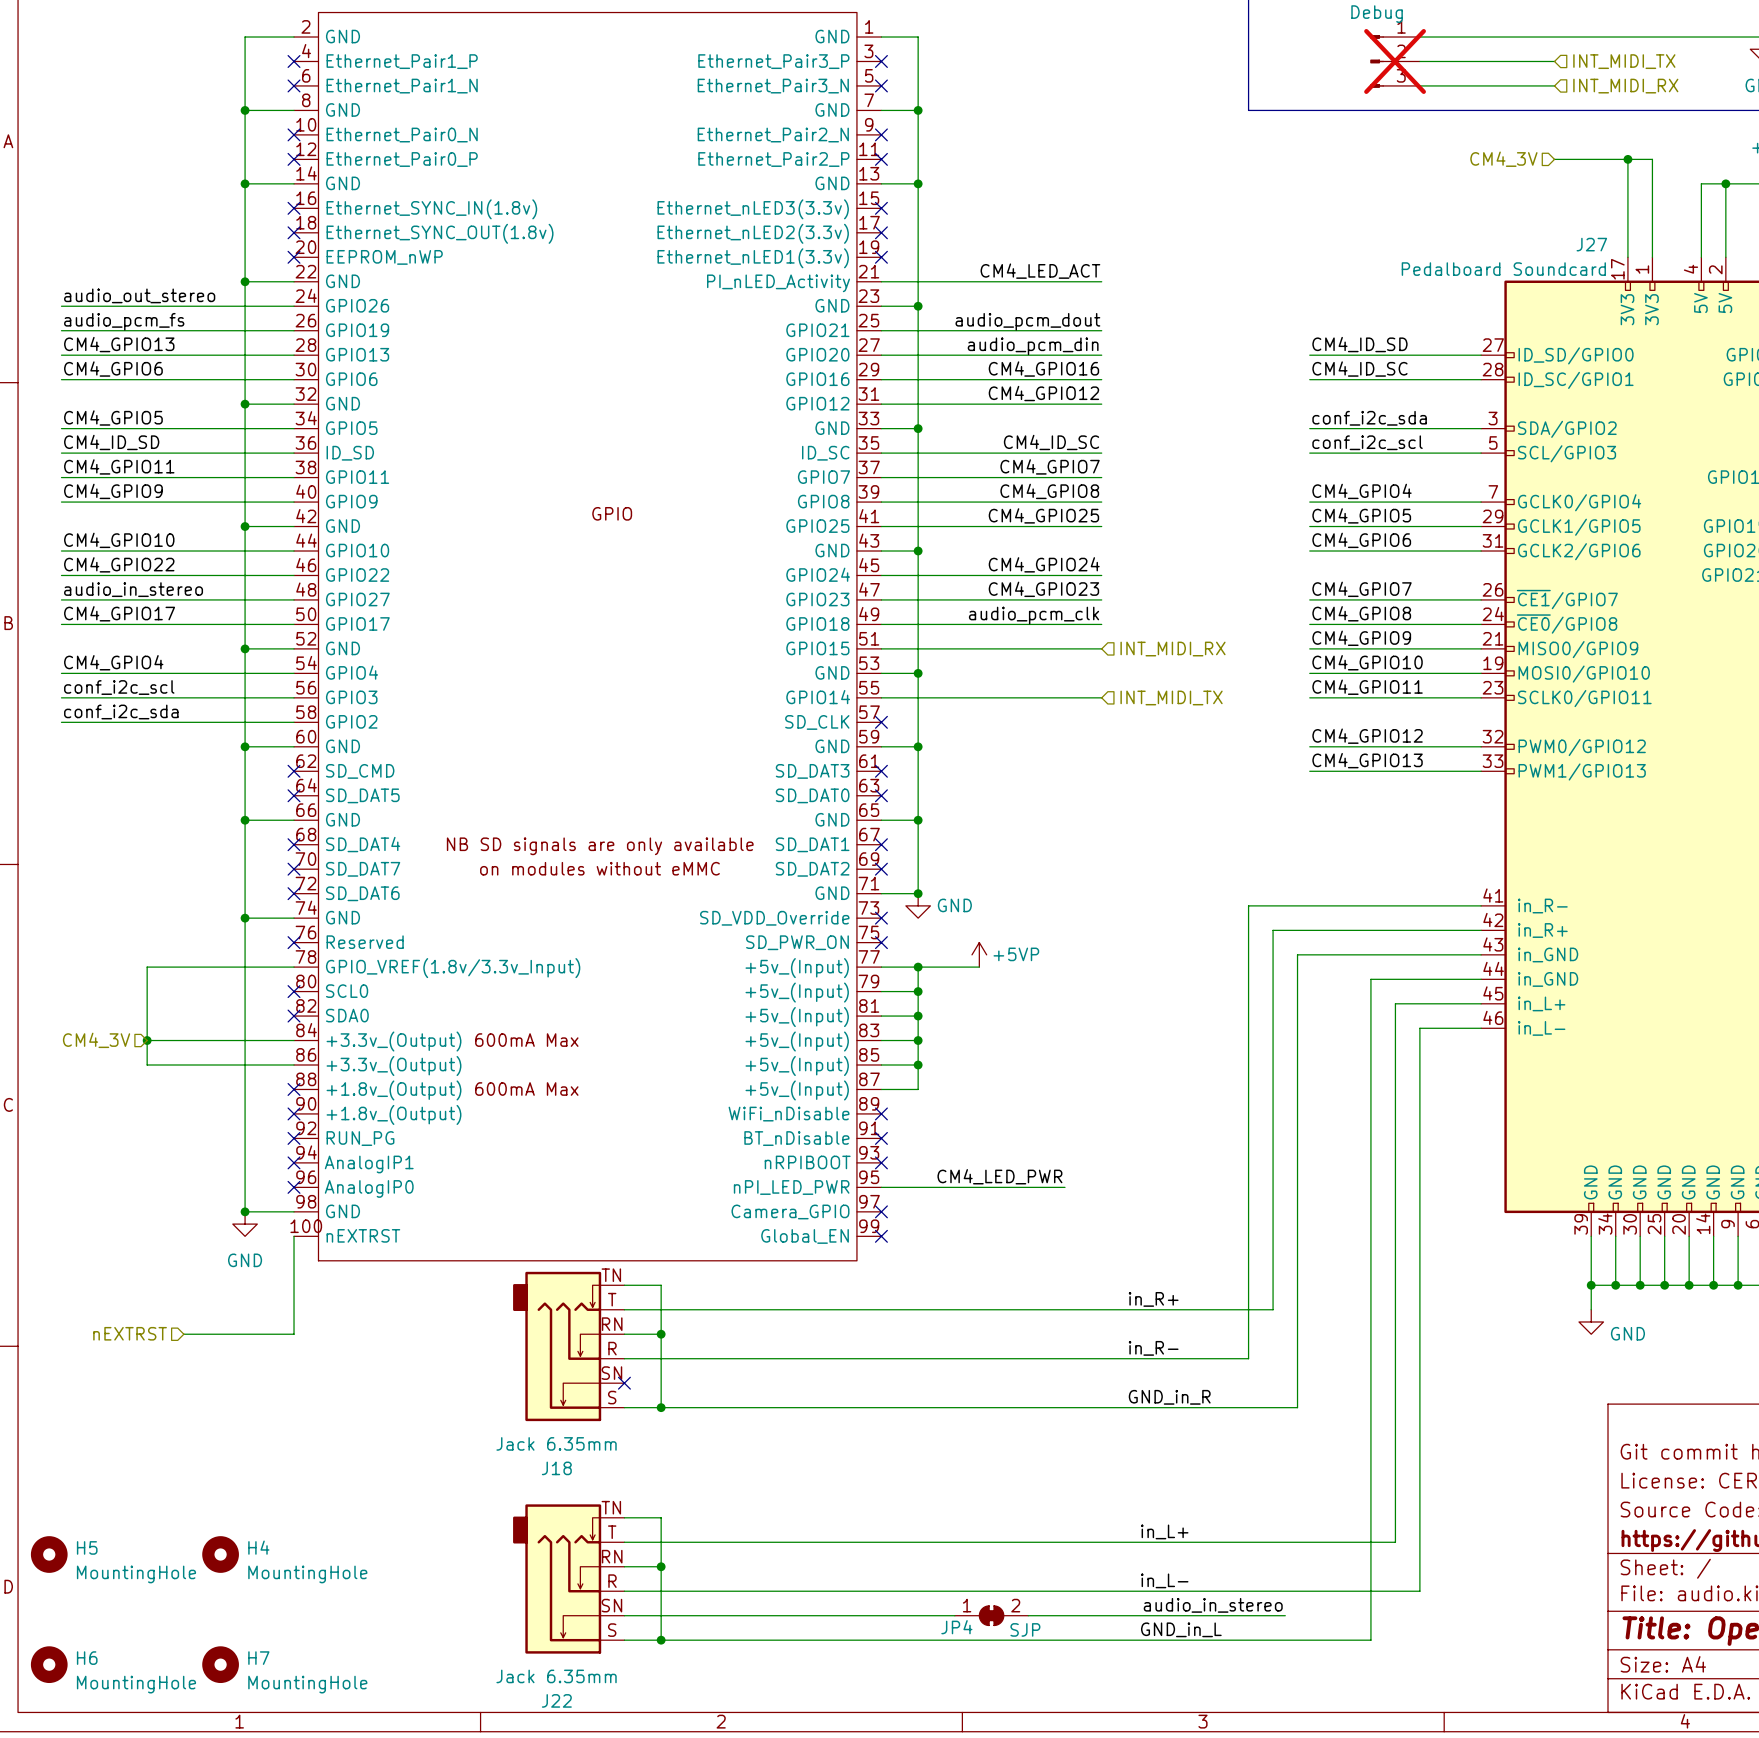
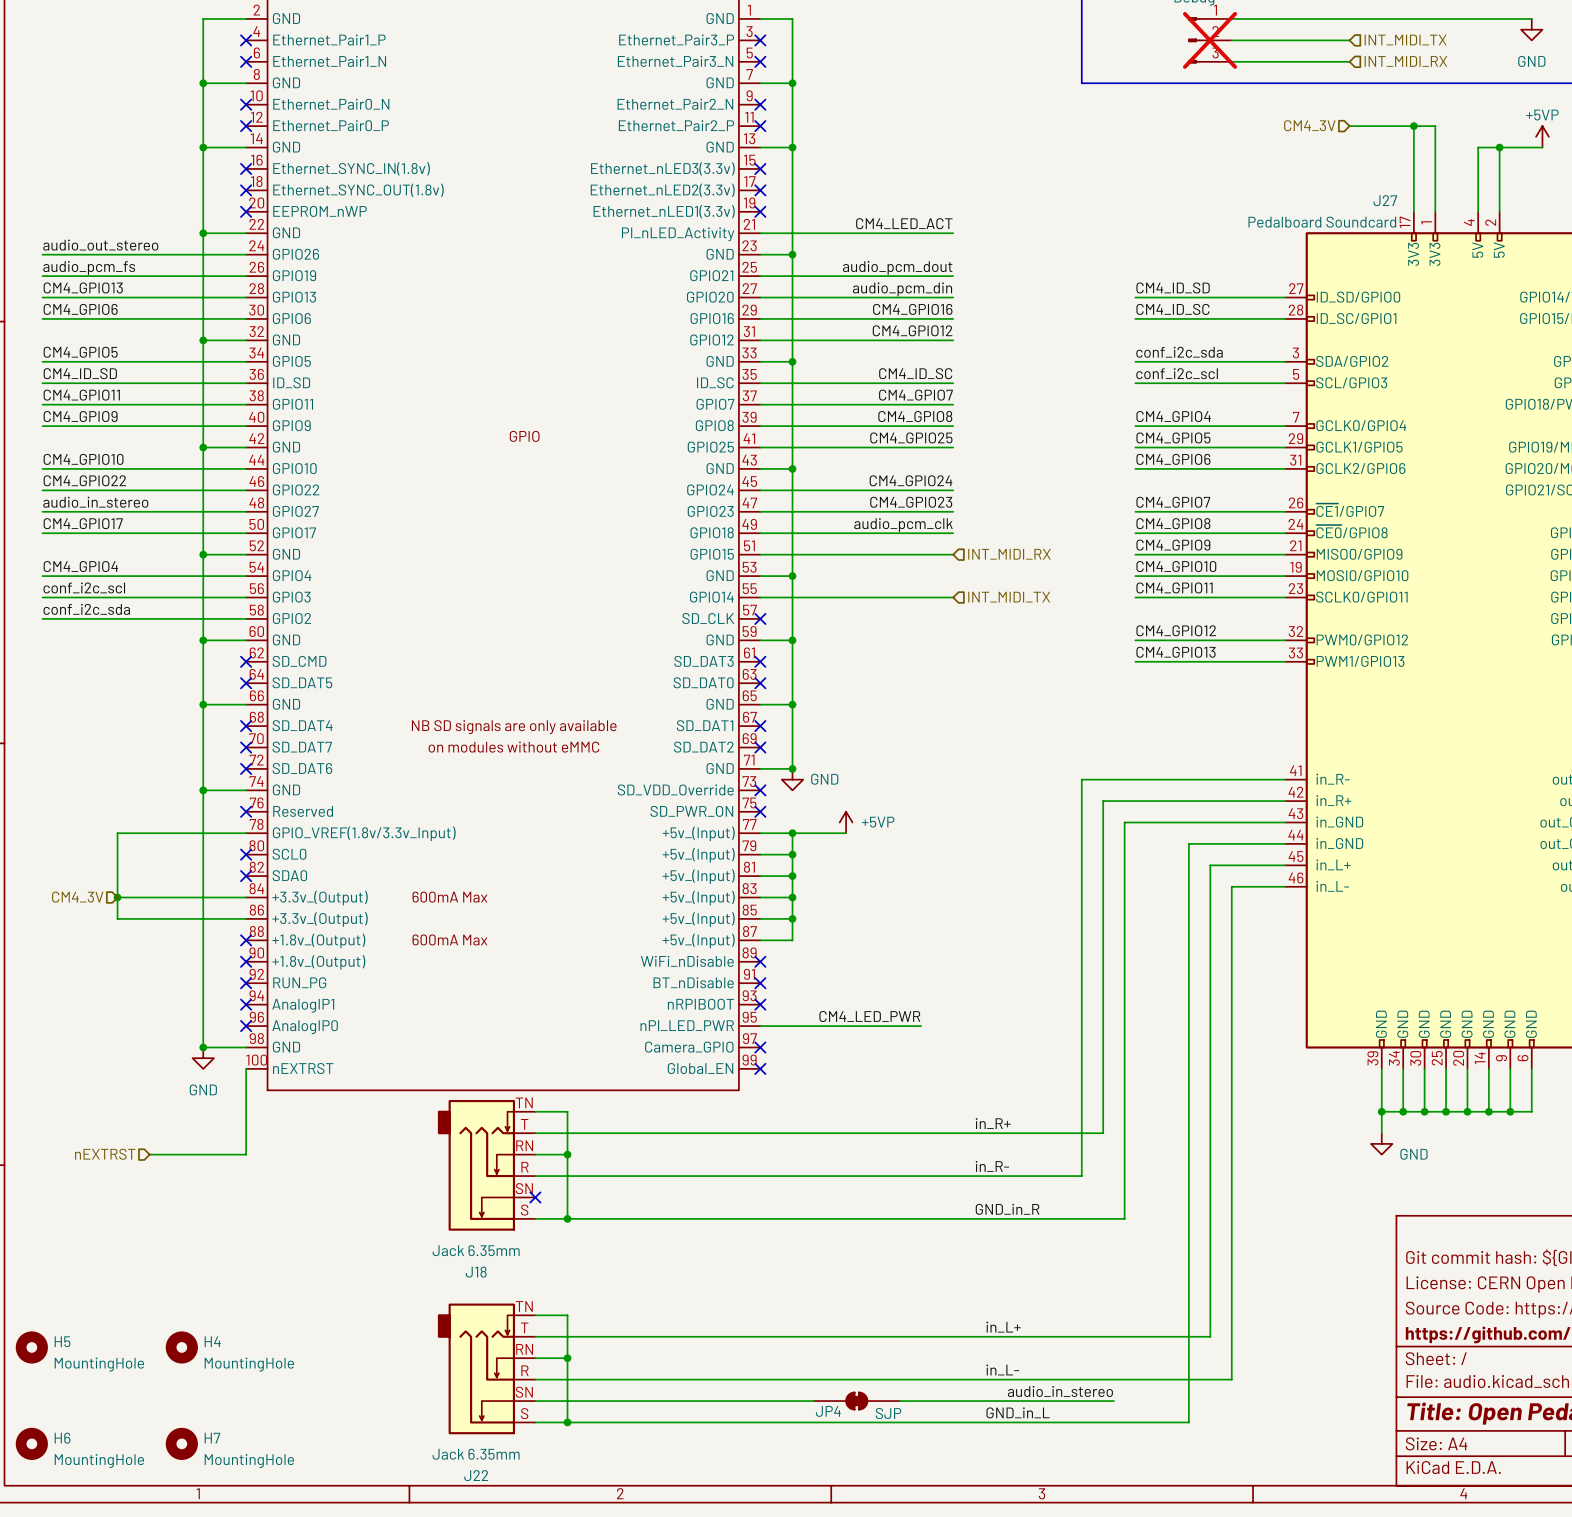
JP4 symbol: [954, 1605, 1029, 1626] -> [813, 1391, 900, 1411]

